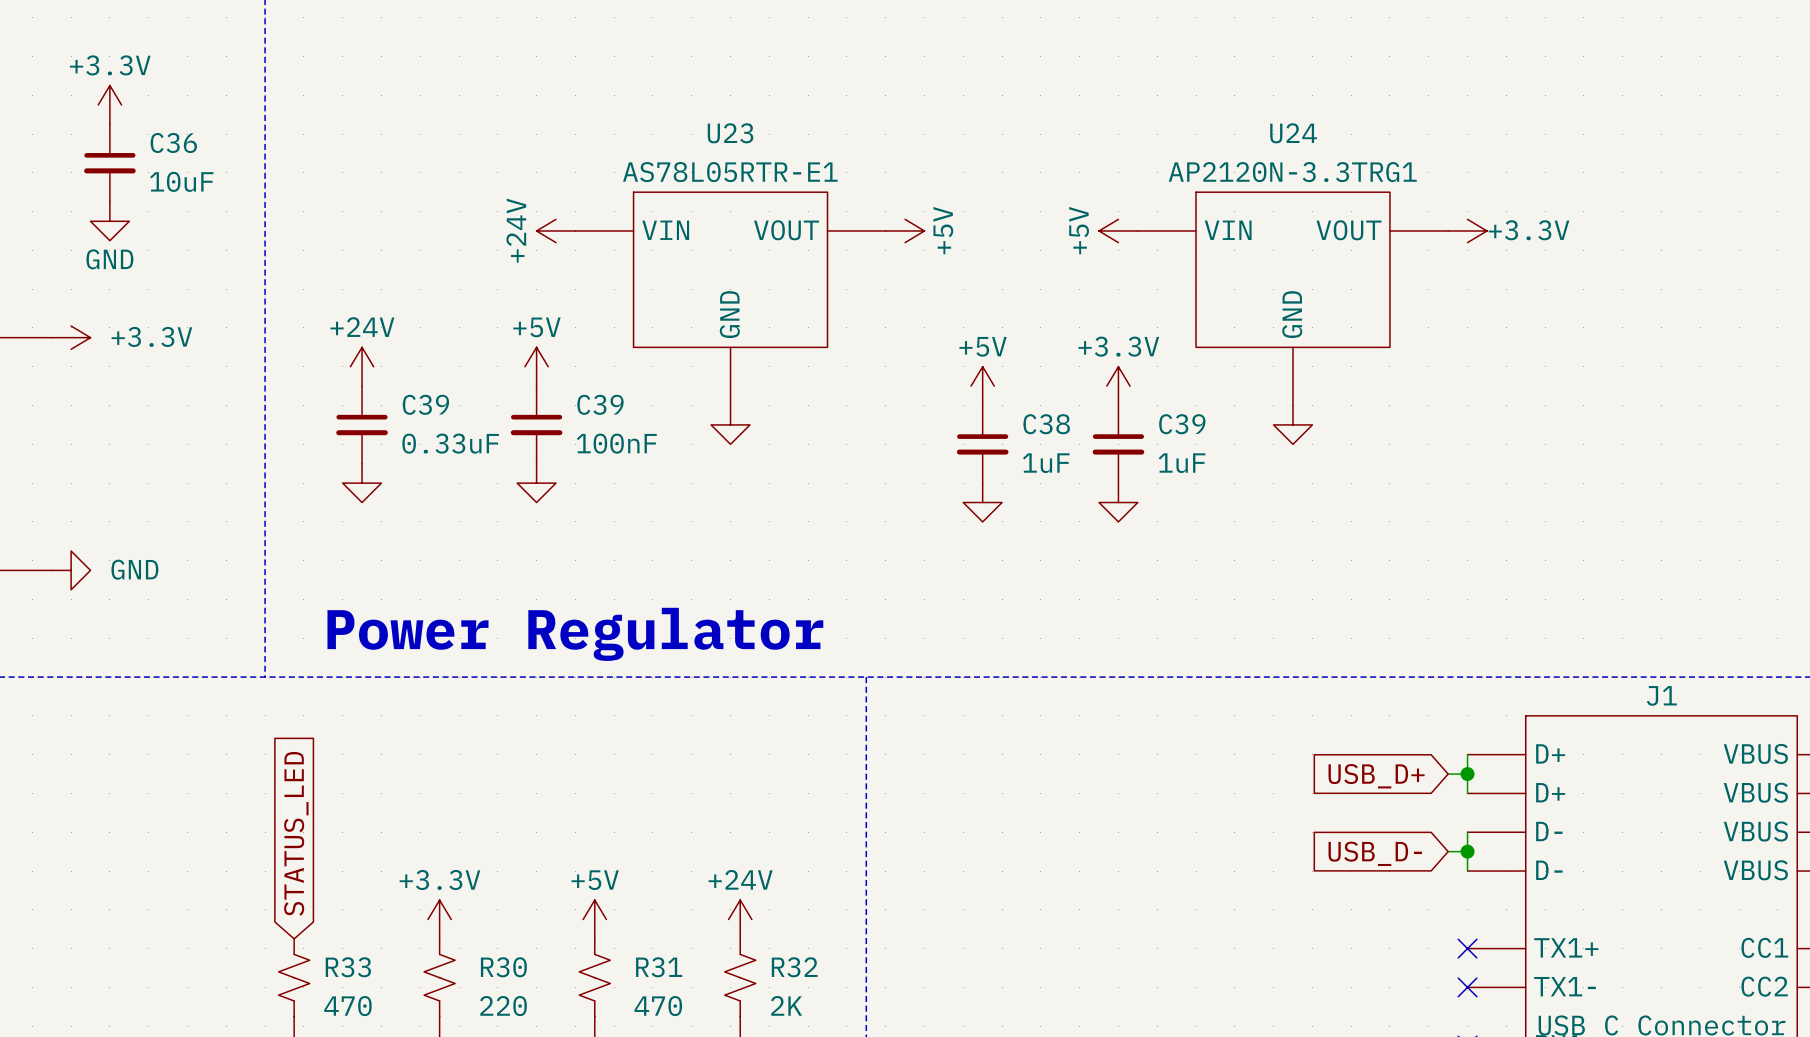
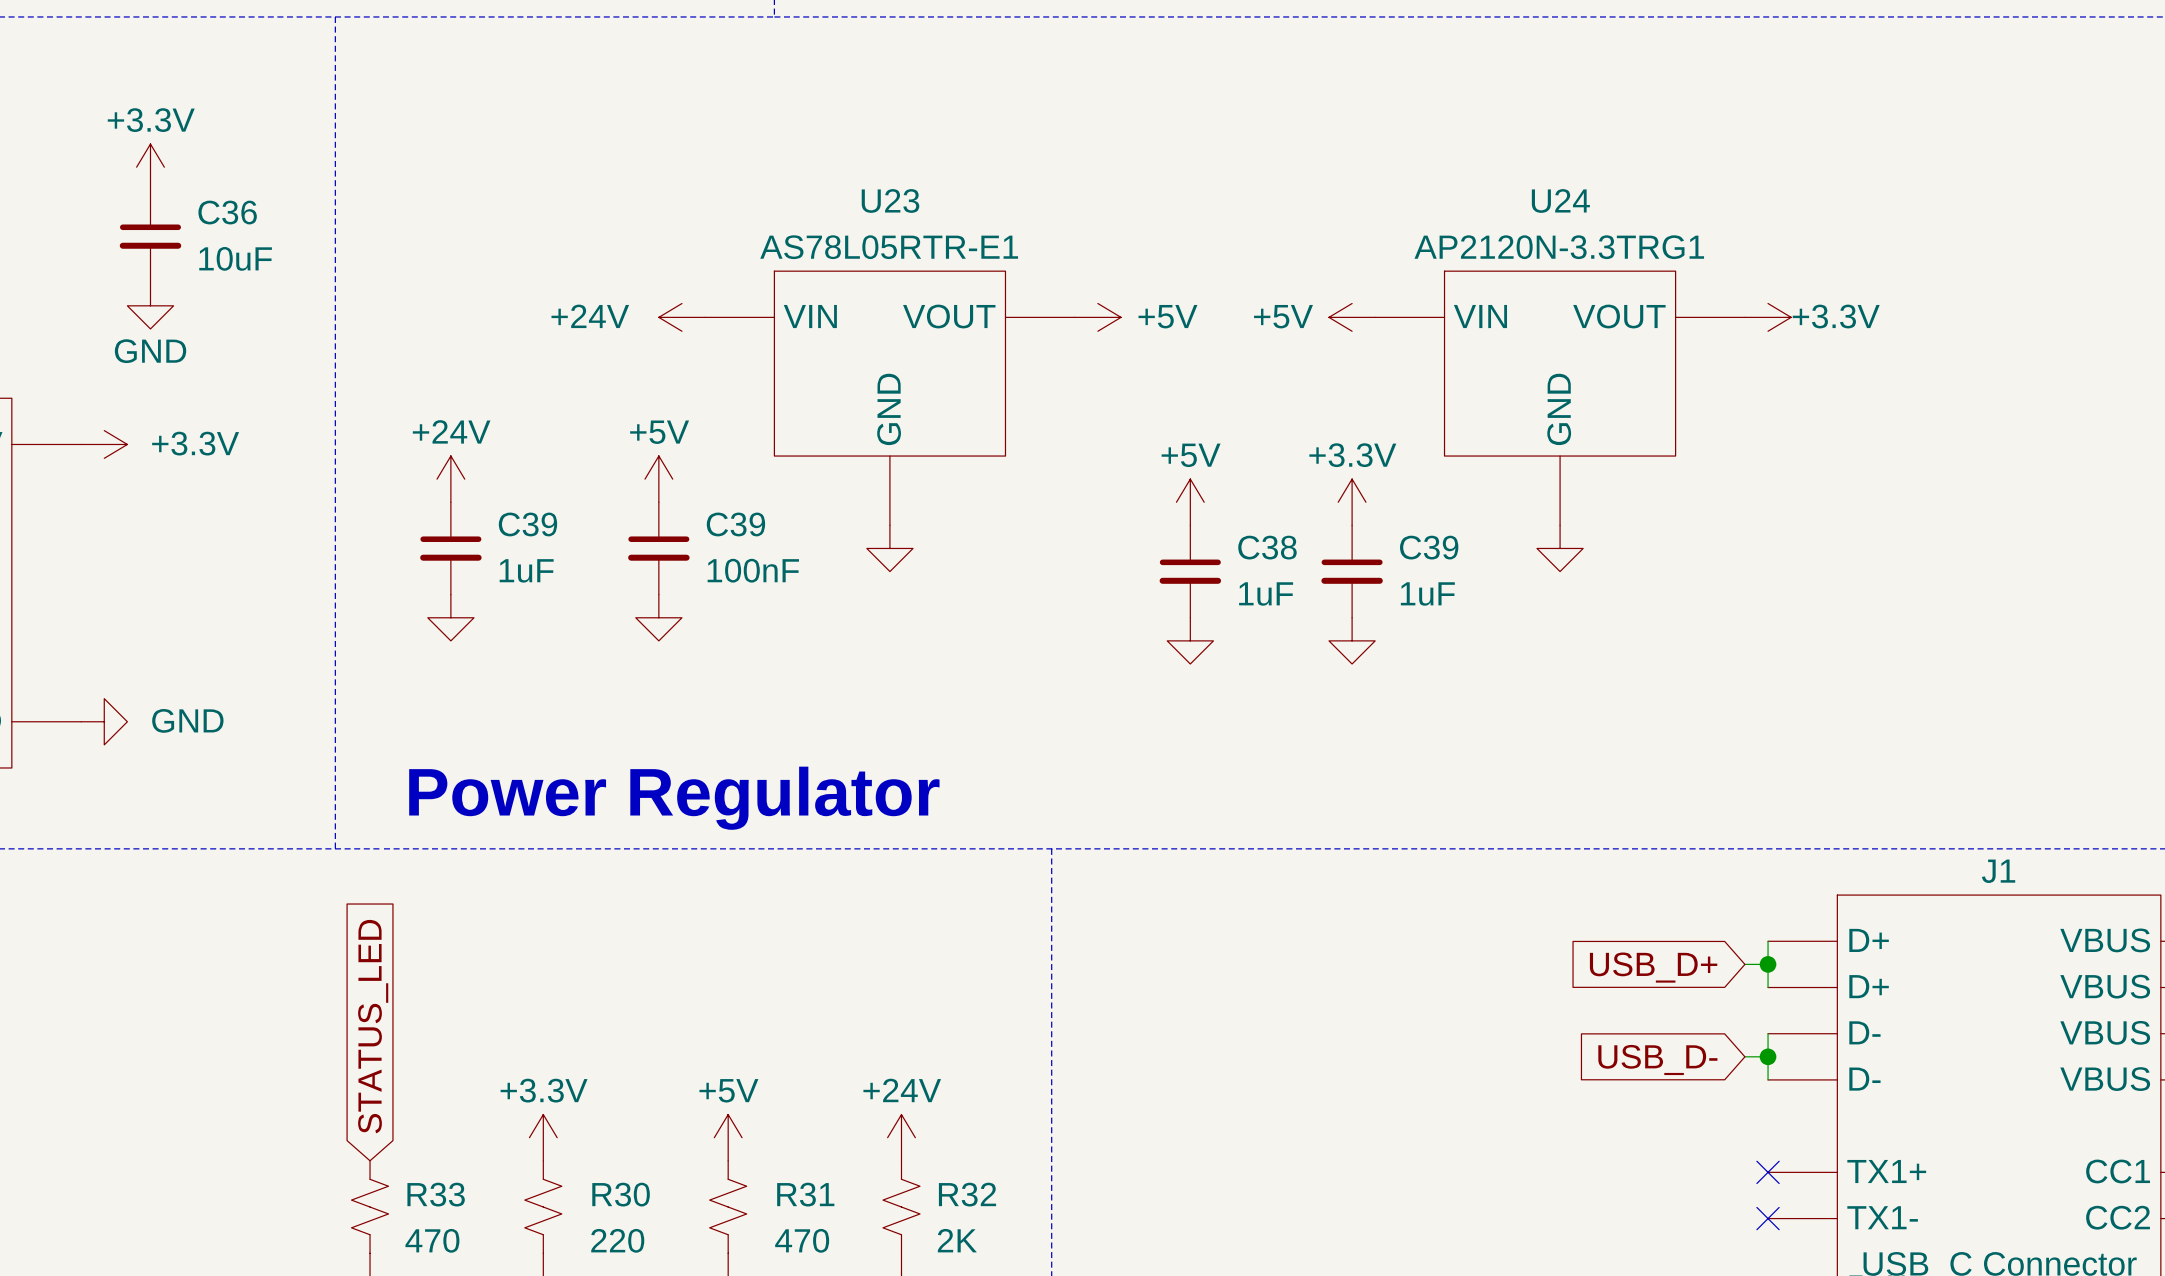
power symbol text rotation: 0° (516, 230) -> 90° clockwise (590, 316)
power symbol text rotation: 0° (943, 230) -> 90° clockwise (1167, 316)
power symbol text rotation: 0° (1079, 230) -> 90° clockwise (1283, 316)
C39 value: 0.33uF (450, 443) -> 1uF (526, 570)

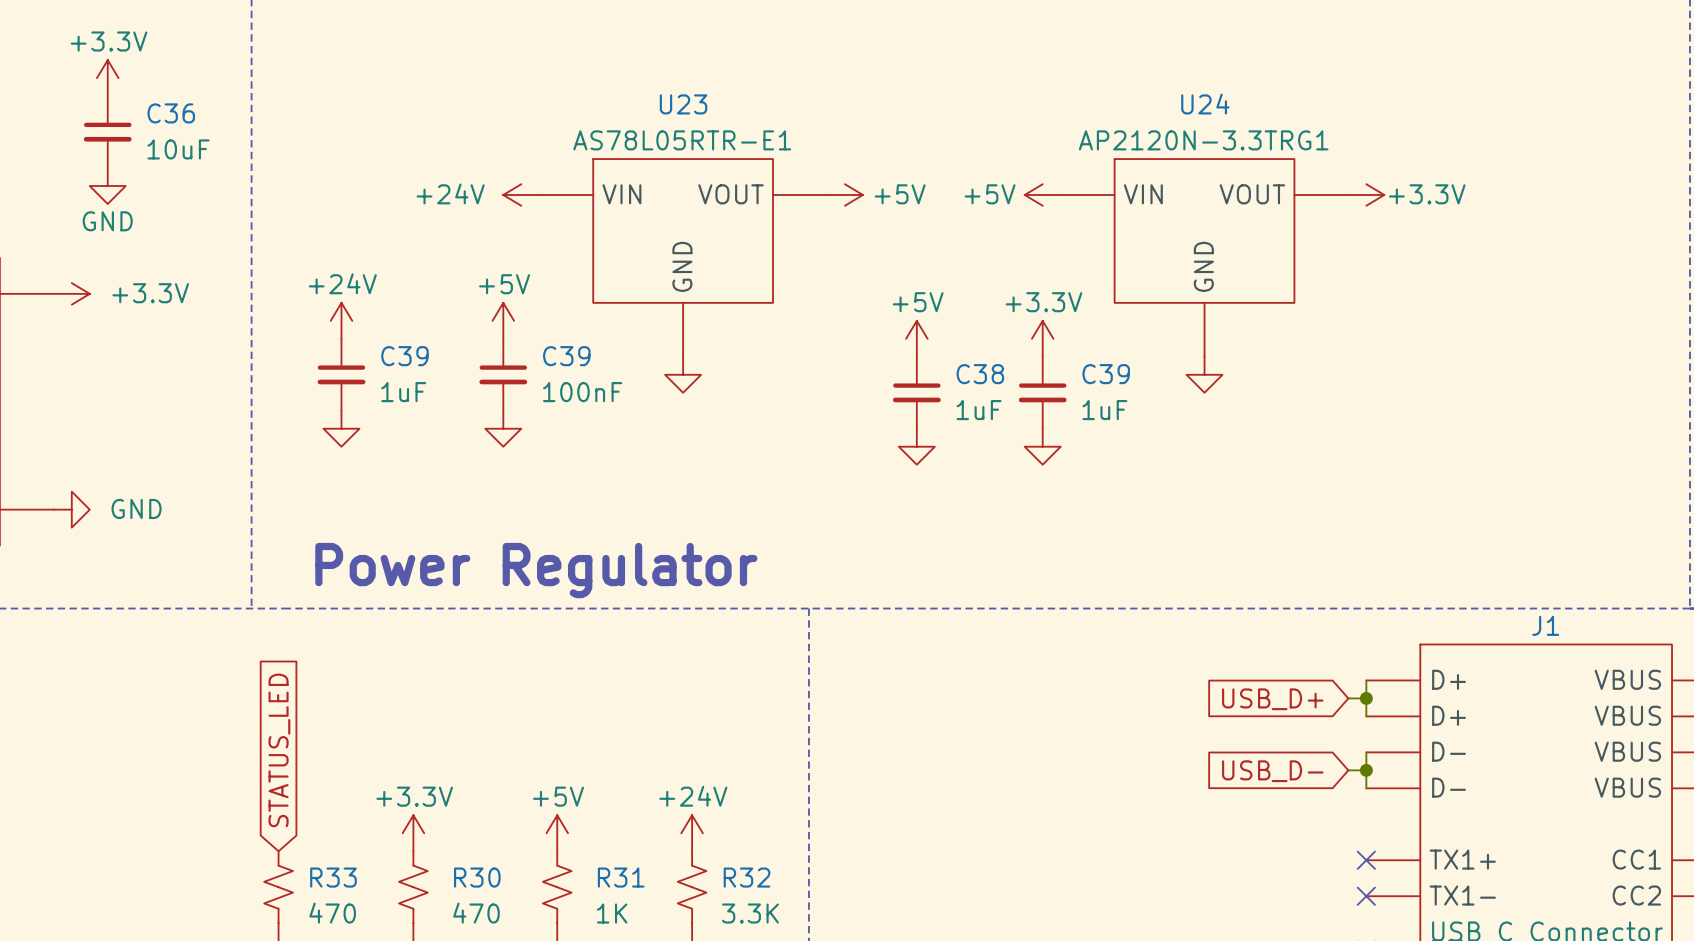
R30 value: 220 (617, 1240) -> 470 (476, 913)
R31 value: 470 (802, 1240) -> 1K (612, 913)
R32 value: 2K (957, 1240) -> 3.3K (750, 913)

